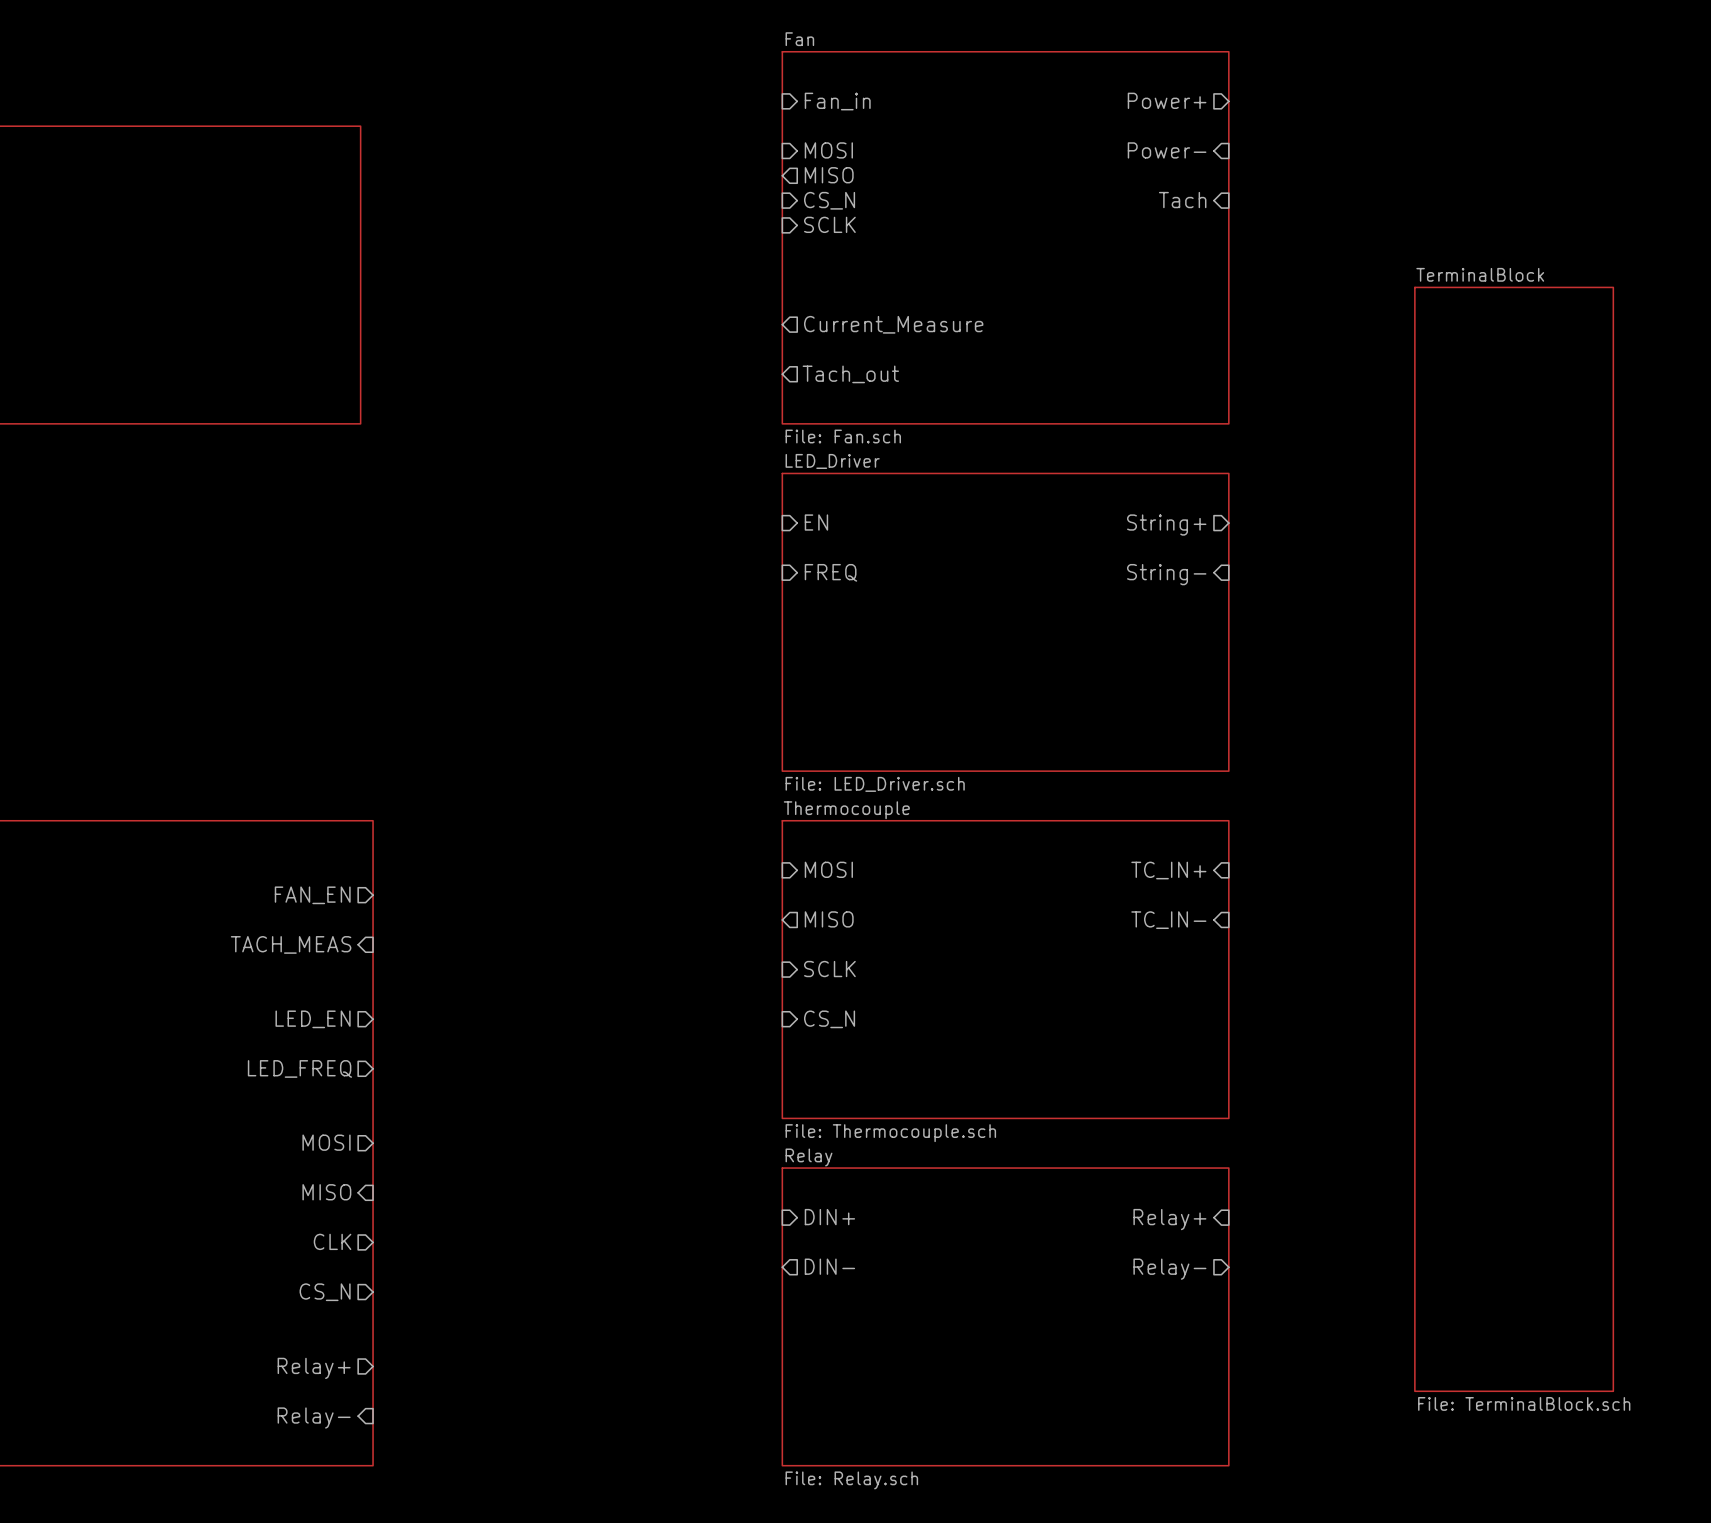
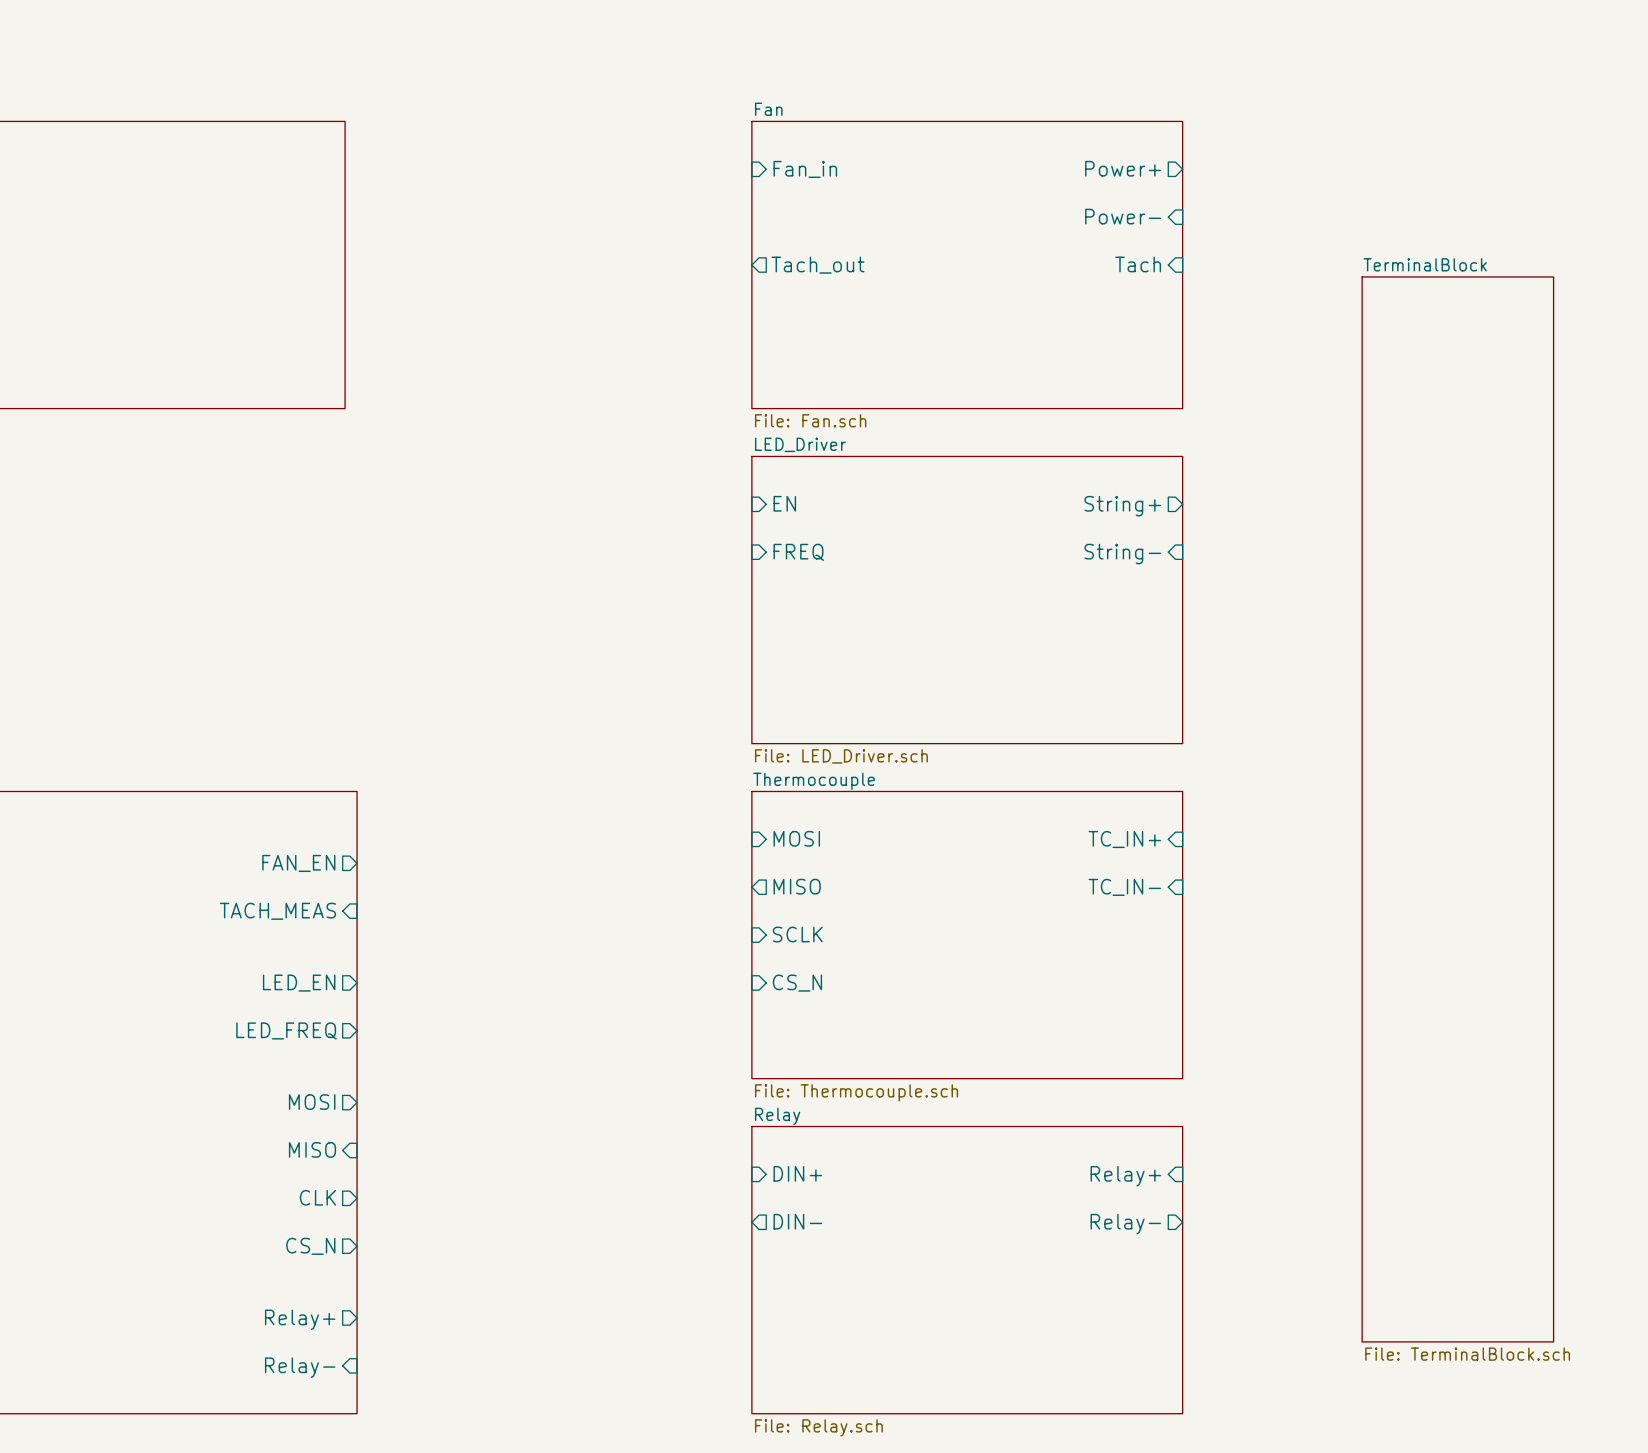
sheet pin position: Power+ (1167, 100) -> Power+ (1123, 168)
sheet pin: Fan_in (837, 101) -> none
sheet pin: MOSI (828, 150) -> none
sheet pin position: Power- (1167, 150) -> Power- (1123, 216)
sheet pin shape: output (829, 175) -> input (805, 169)
sheet pin: MISO (829, 175) -> Fan_in (805, 169)
sheet pin: CS_N (829, 200) -> none
sheet pin position: Tach (1182, 200) -> Tach (1138, 264)
sheet pin: SCLK (829, 224) -> none
sheet Fan: File: Fan.sch (1005, 237) -> none
sheet Fan: none -> File: Fan.sch (967, 265)
sheet pin: Current_Measure (893, 324) -> none
sheet pin position: Tach_out (850, 374) -> Tach_out (817, 265)

